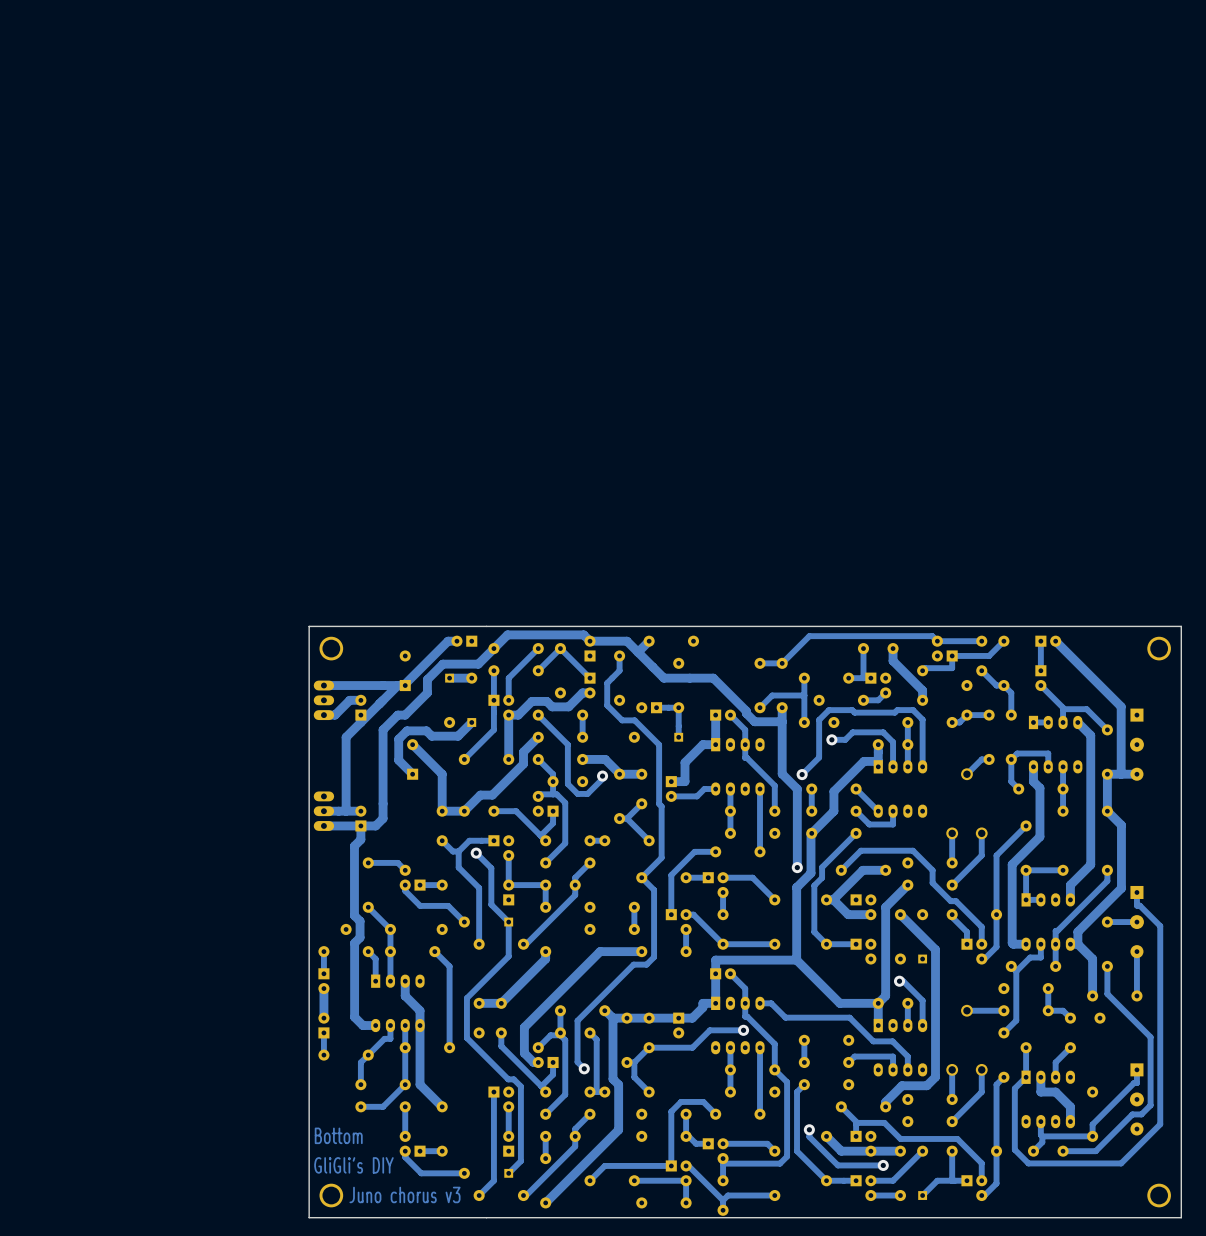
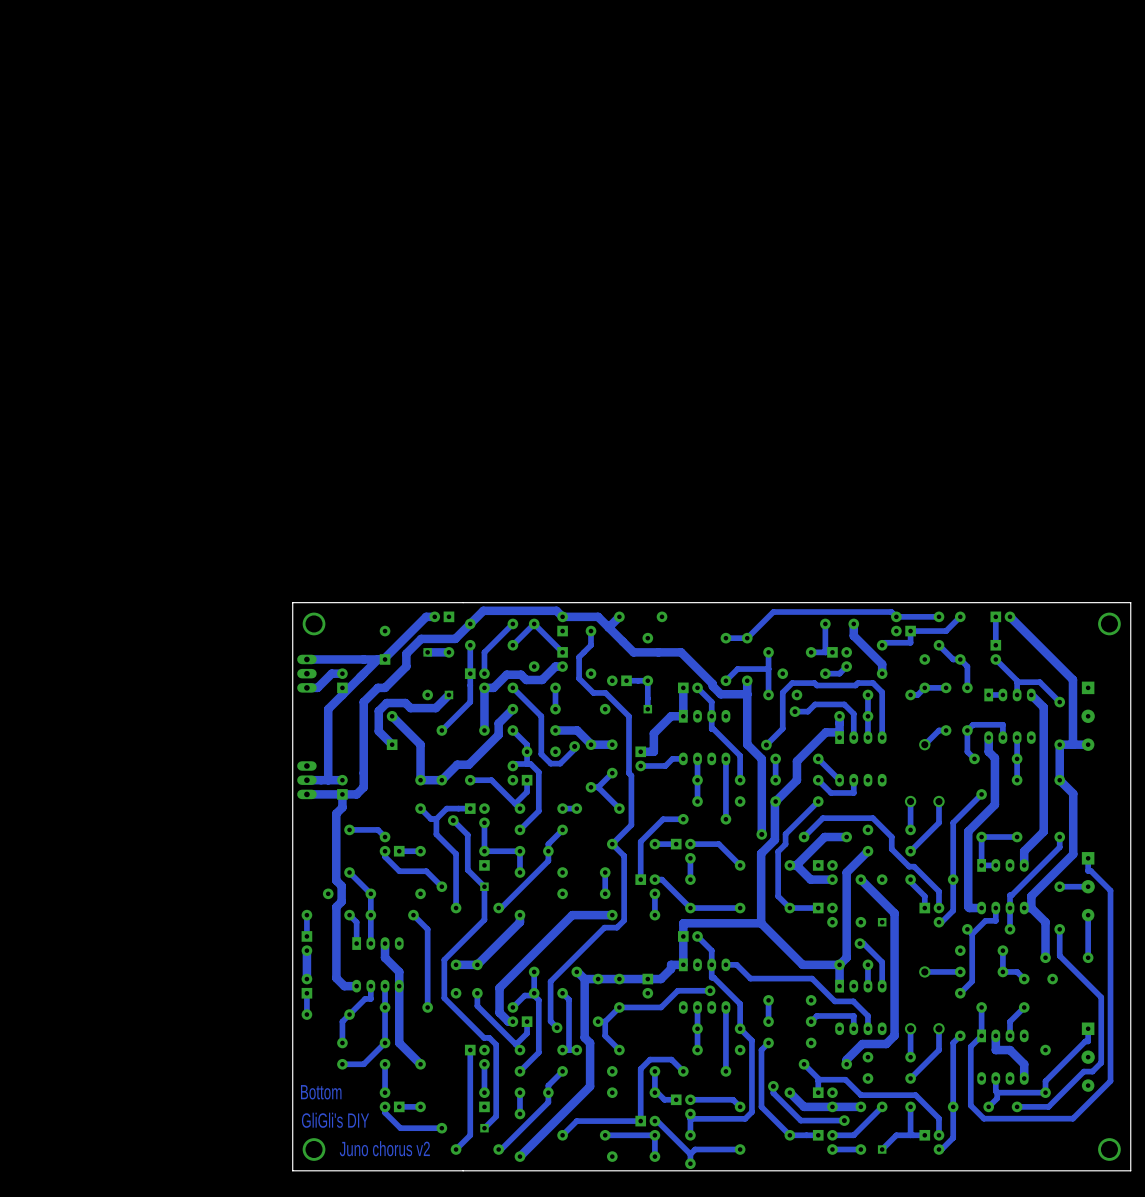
text: Juno chorus v3 (405, 1194) -> Juno chorus v2 (384, 1148)

